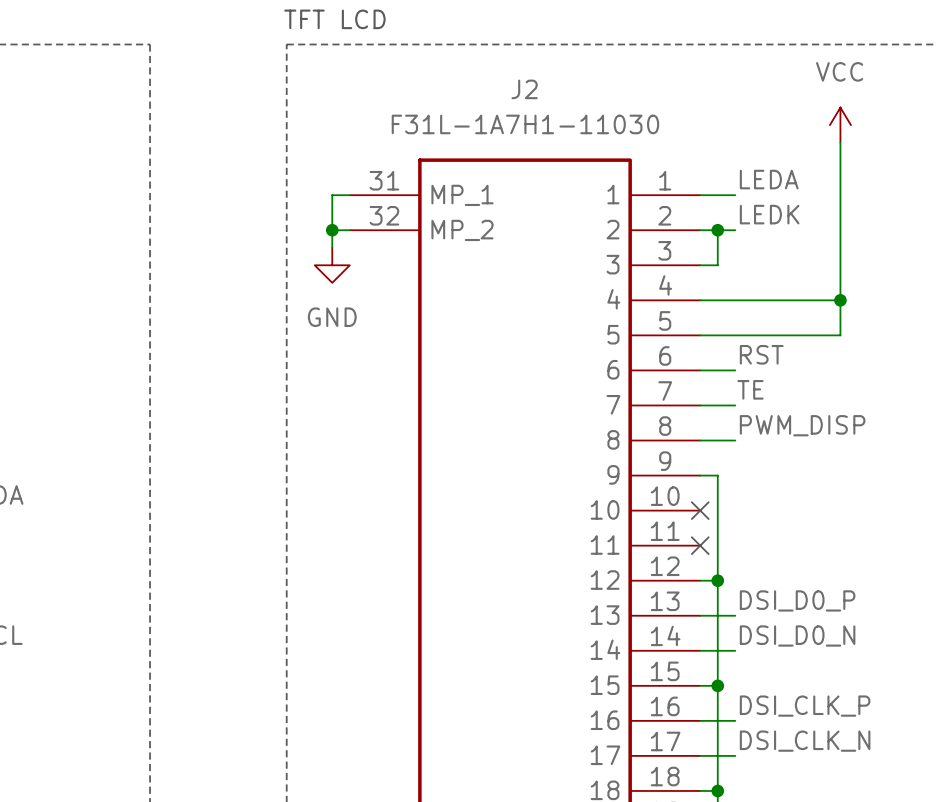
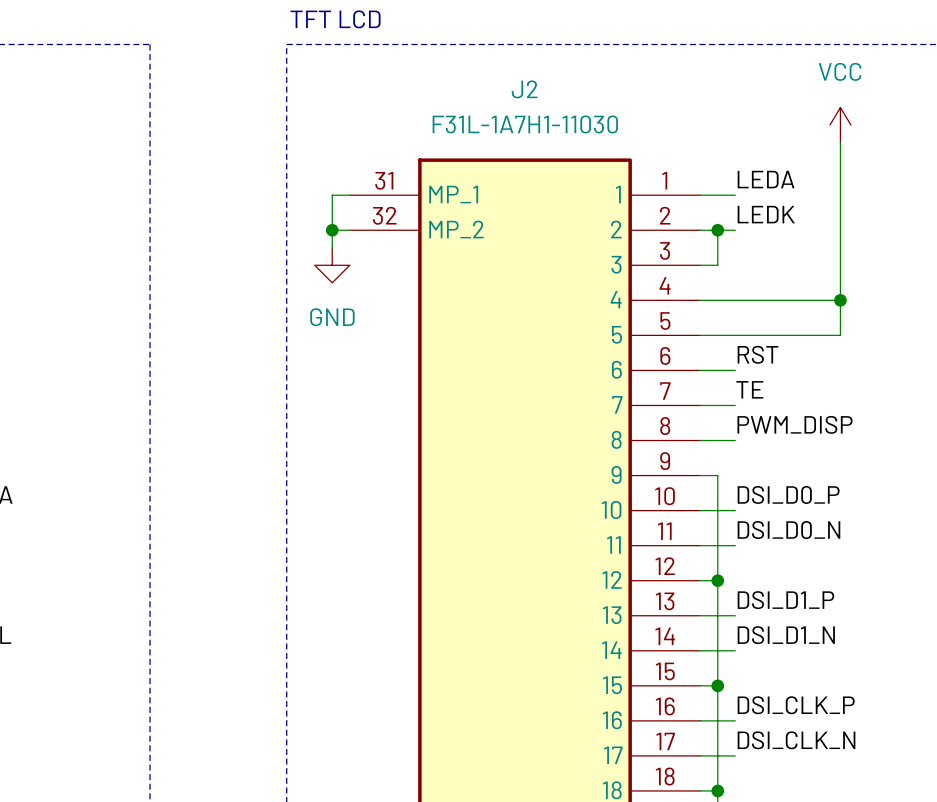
label: none -> DSI_D0_P (788, 494)
wire: none -> (700, 510) (735, 510)
no-connect mark: (700, 510) -> none
label: none -> DSI_D0_N (788, 530)
wire: none -> (700, 545) (735, 545)
no-connect mark: (700, 545) -> none
label: DSI_D0_P (797, 600) -> DSI_D1_P (785, 600)
label: DSI_D0_N (797, 635) -> DSI_D1_N (786, 635)

